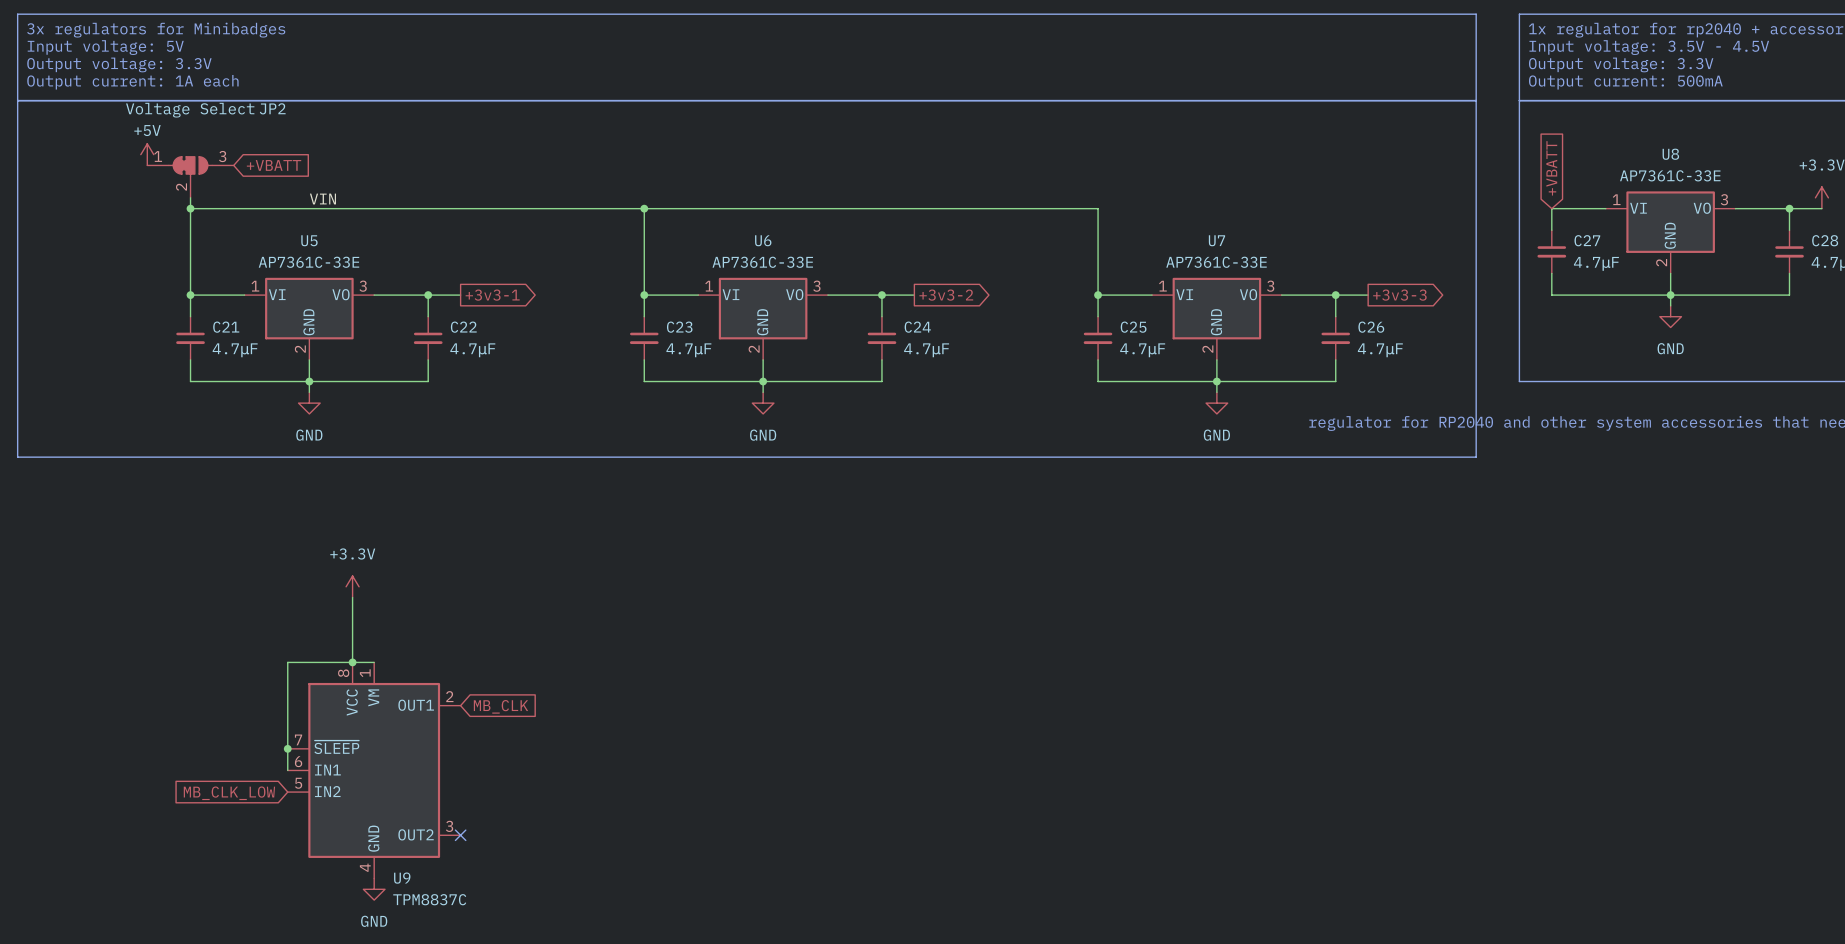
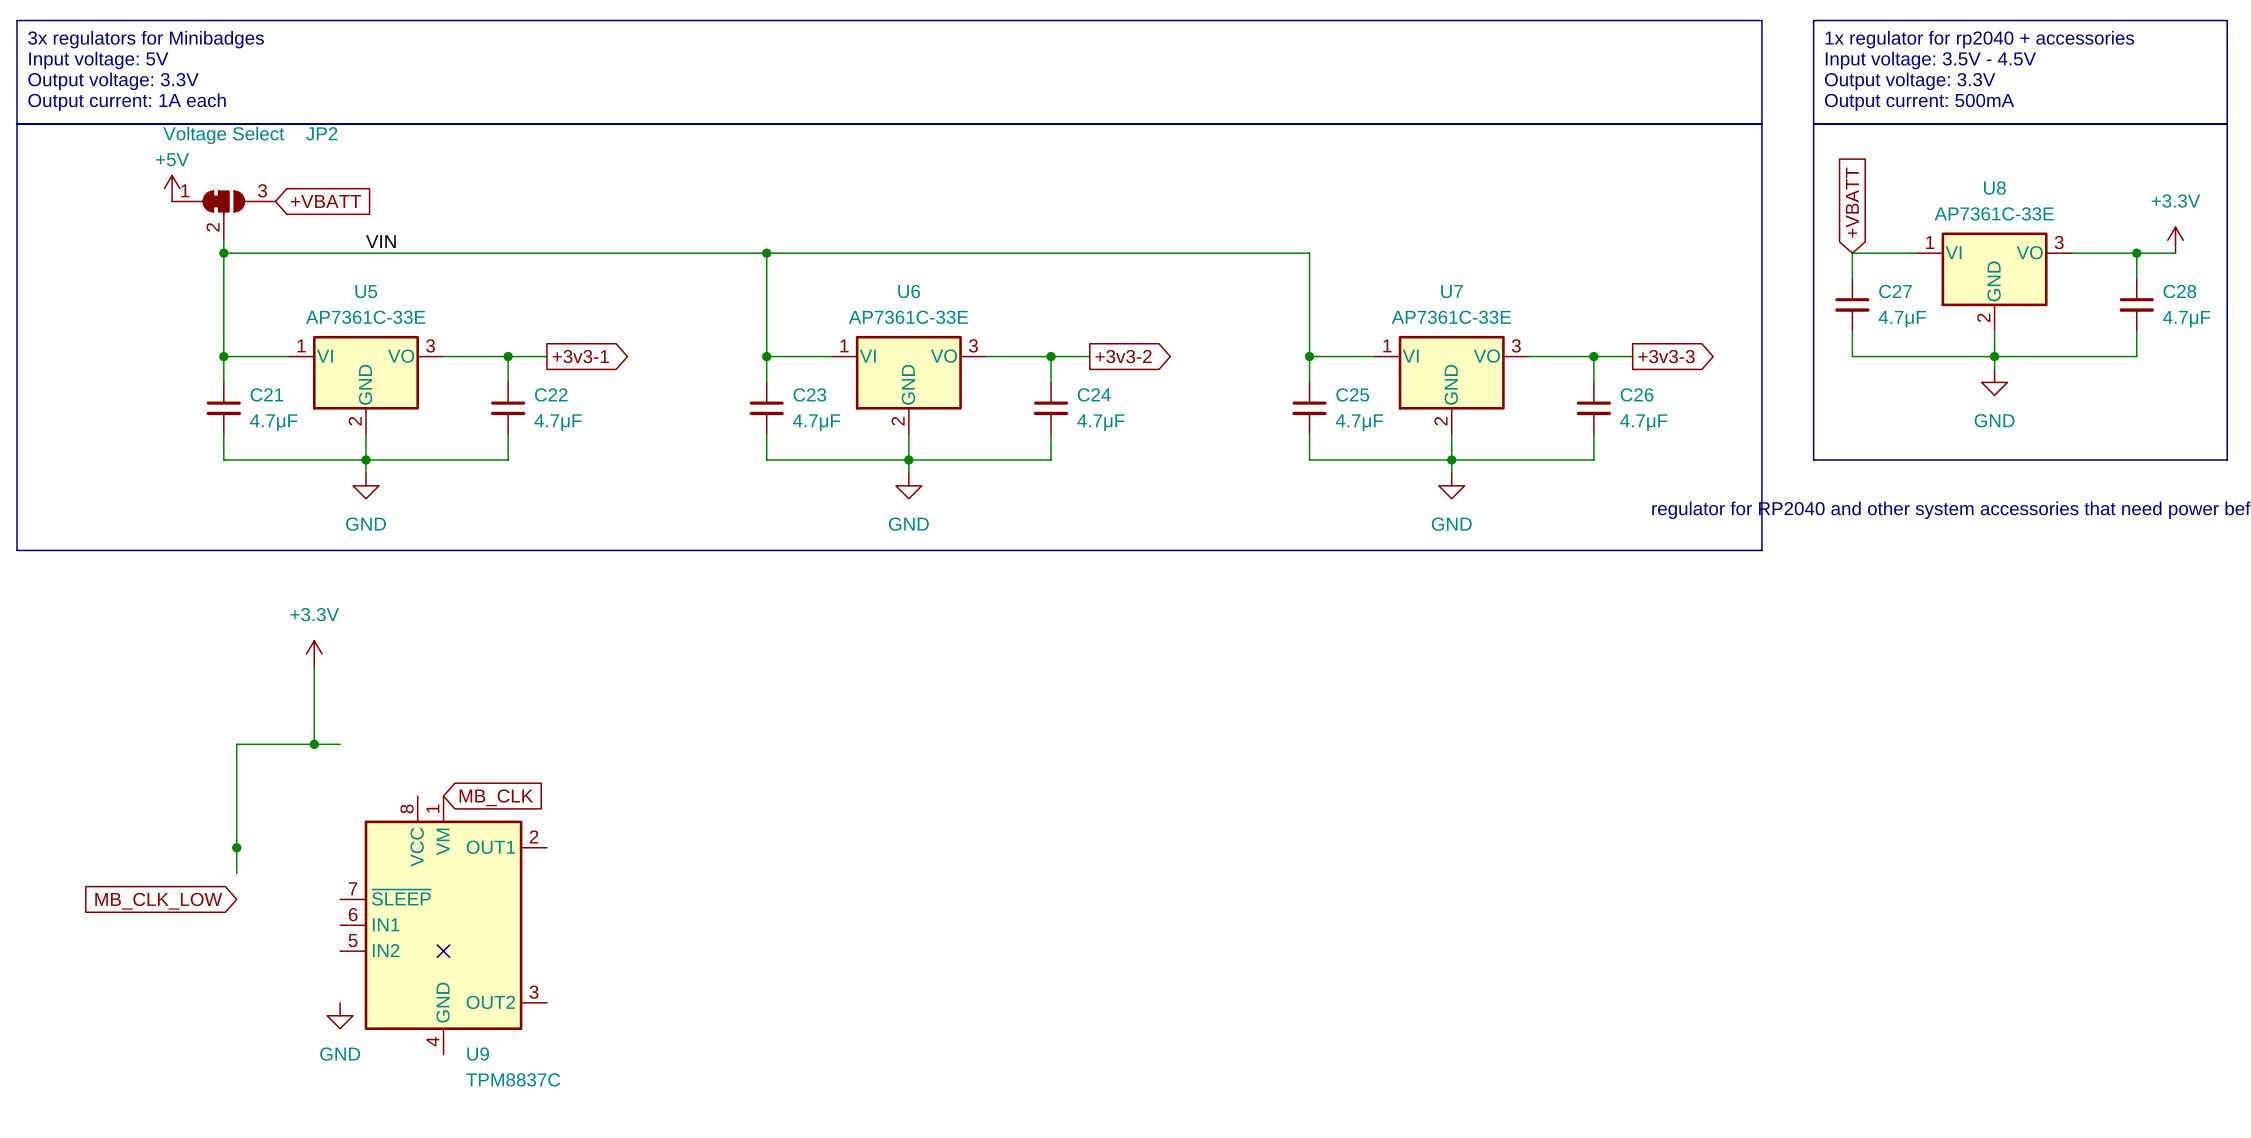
power symbol position: +3.3V (352, 586) -> +3.3V (314, 653)
wire: (352, 597) (352, 662) -> (314, 666) (314, 744)
junction: none -> (314, 744)
junction: (352, 662) -> none
wire: (374, 662) (287, 662) (287, 770) -> (340, 744) (236, 744) (236, 873)
junction: none -> (236, 847)
global label position: MB_CLK (500, 706) -> MB_CLK (496, 797)
junction: (287, 748) -> none
no-connect mark: none -> (443, 951)
global label position: MB_CLK_LOW (229, 793) -> MB_CLK_LOW (158, 901)
no-connect mark: (460, 835) -> none
power symbol position: GND (374, 889) -> GND (340, 1015)

